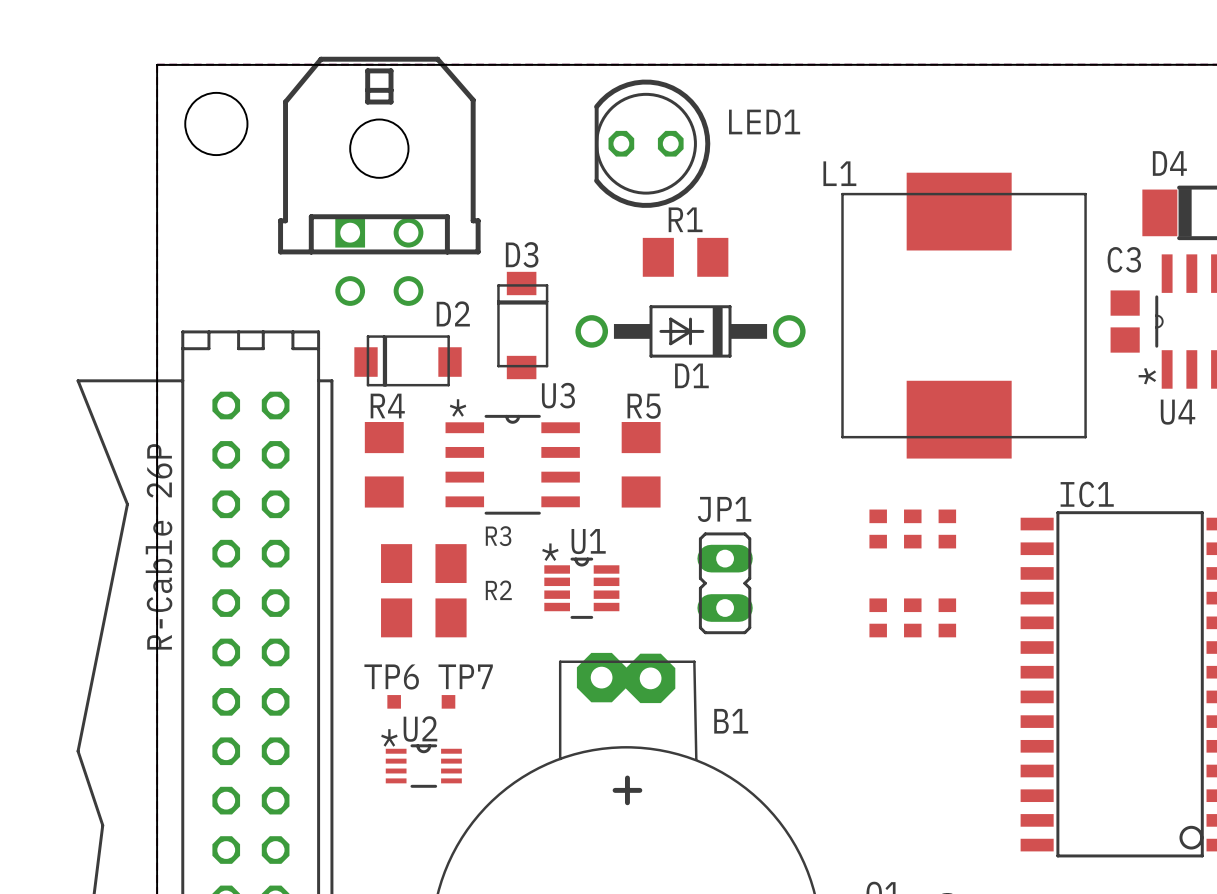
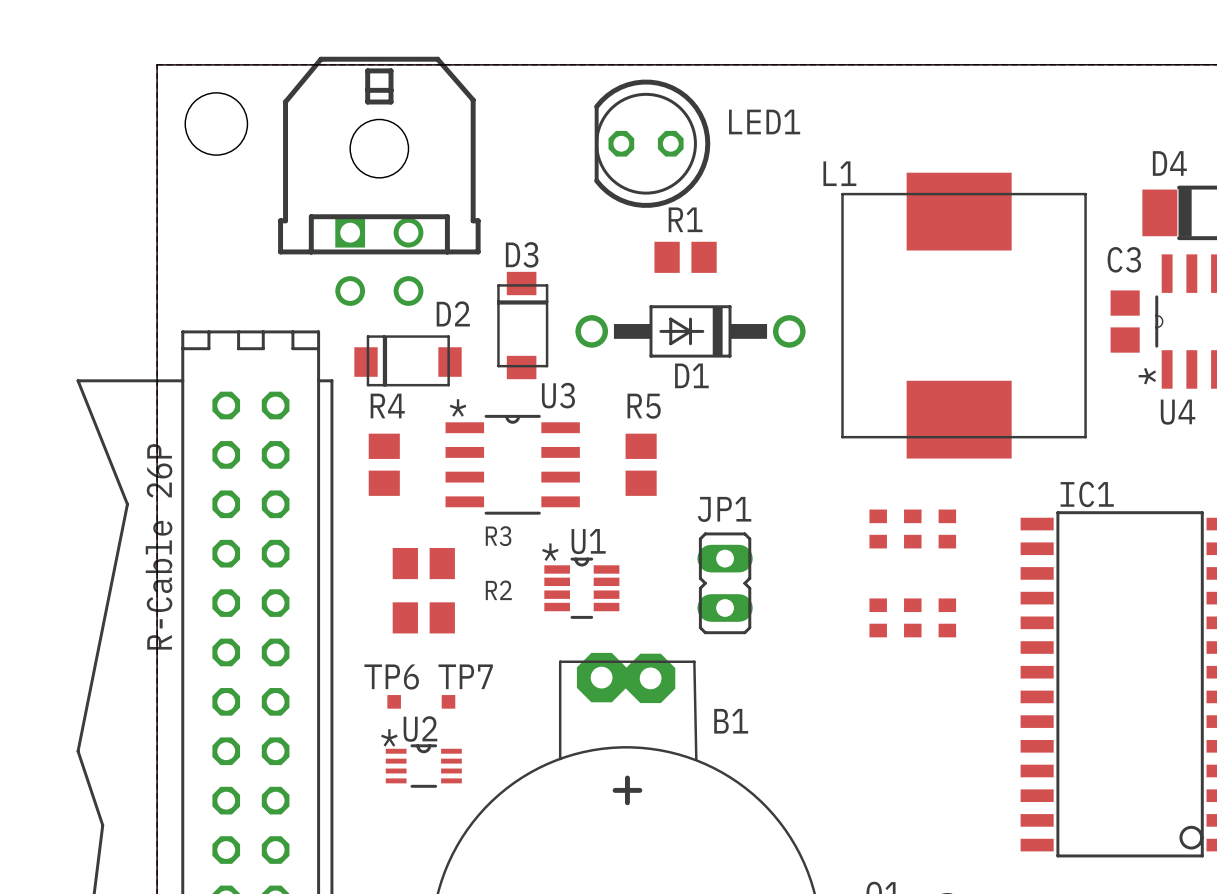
R1 footprint: [642, 237, 729, 277] -> [654, 241, 717, 273]
R4 footprint: [364, 421, 404, 508] -> [368, 433, 400, 496]
R5 footprint: [621, 421, 661, 508] -> [625, 433, 657, 496]
R3 footprint: [381, 544, 467, 584] -> [392, 548, 455, 580]
R2 footprint: [381, 598, 467, 638] -> [392, 602, 455, 634]

